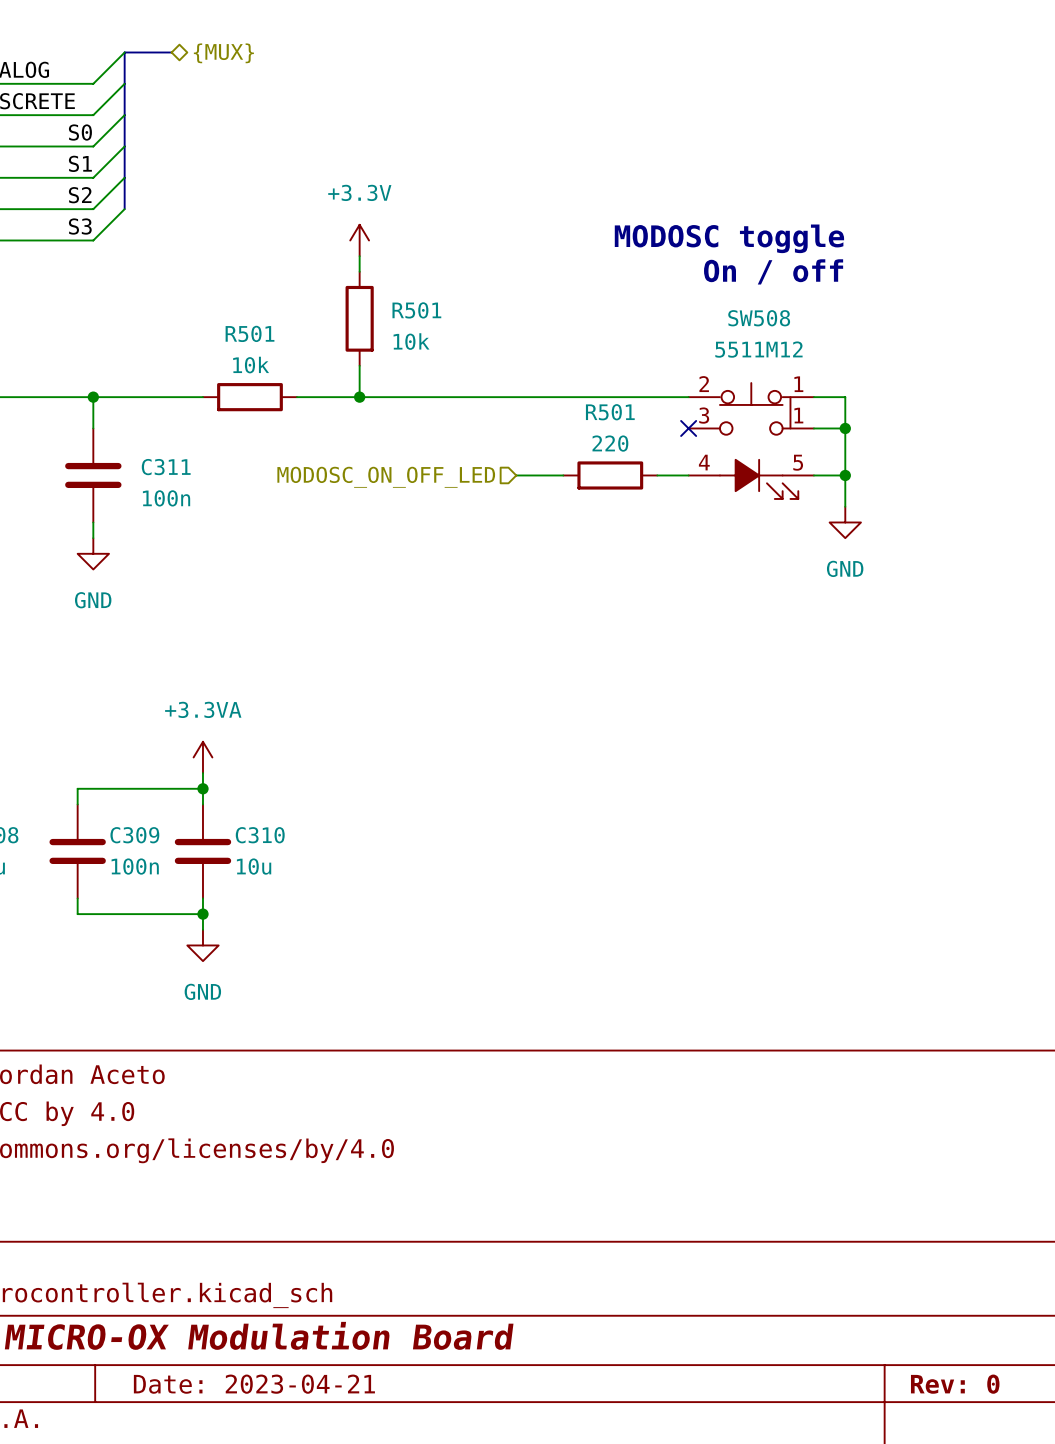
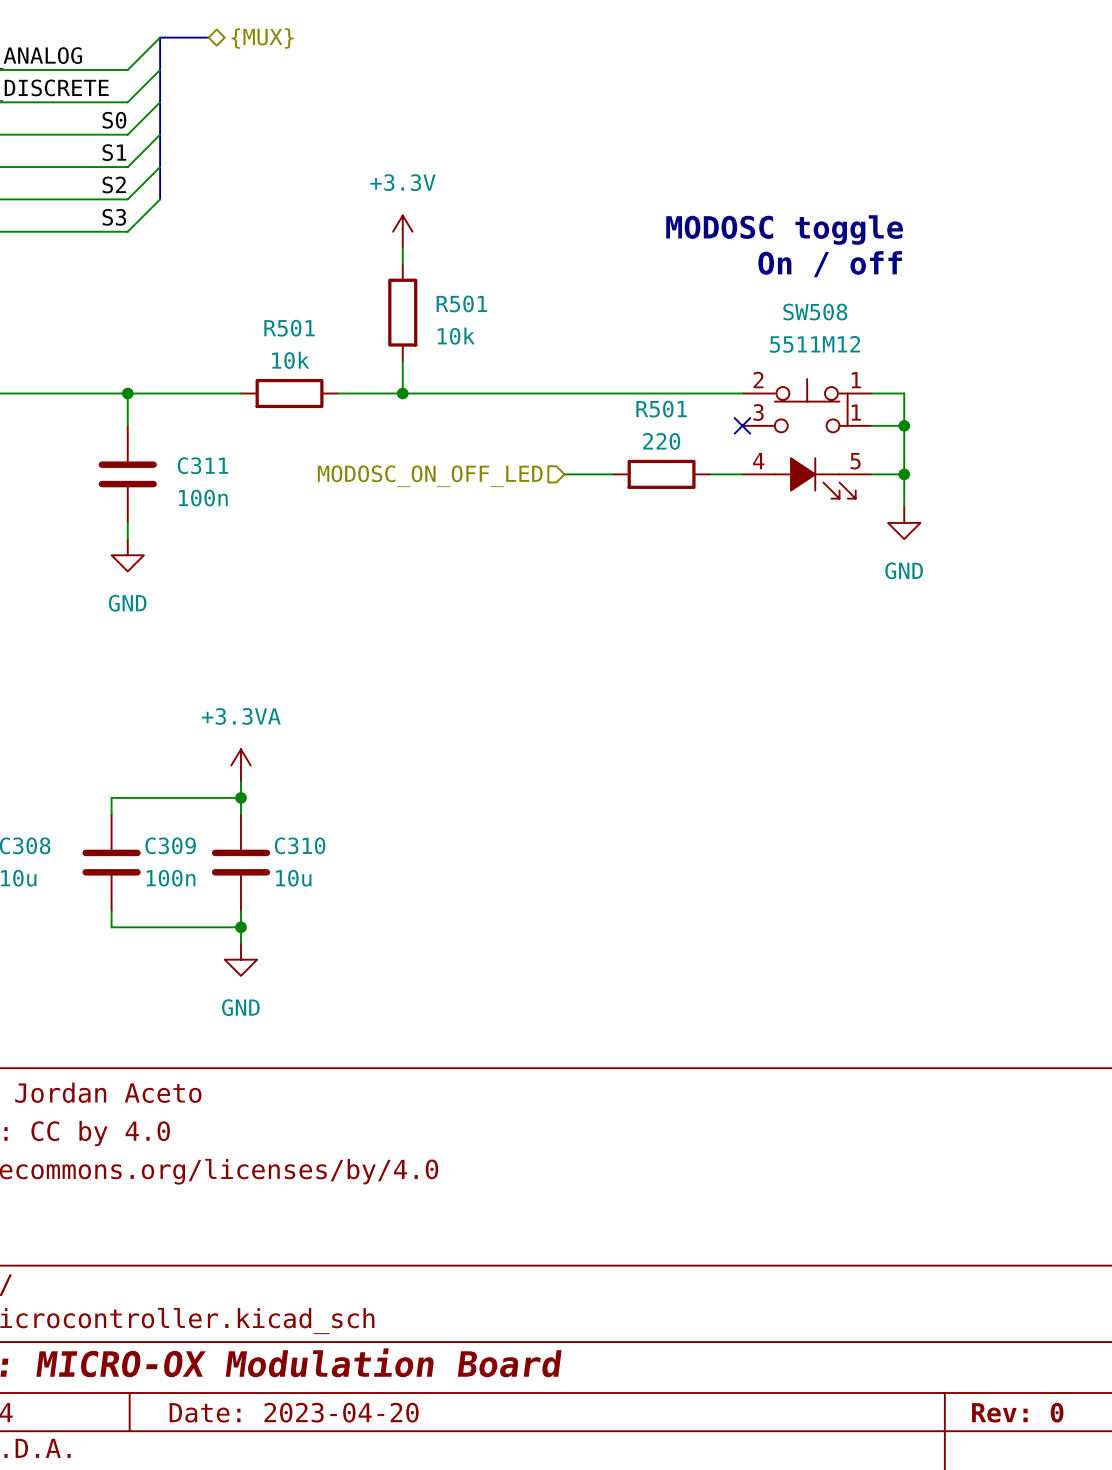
title block: Date: 2023-04-21 (254, 1384) -> Date: 2023-04-20 (294, 1412)

